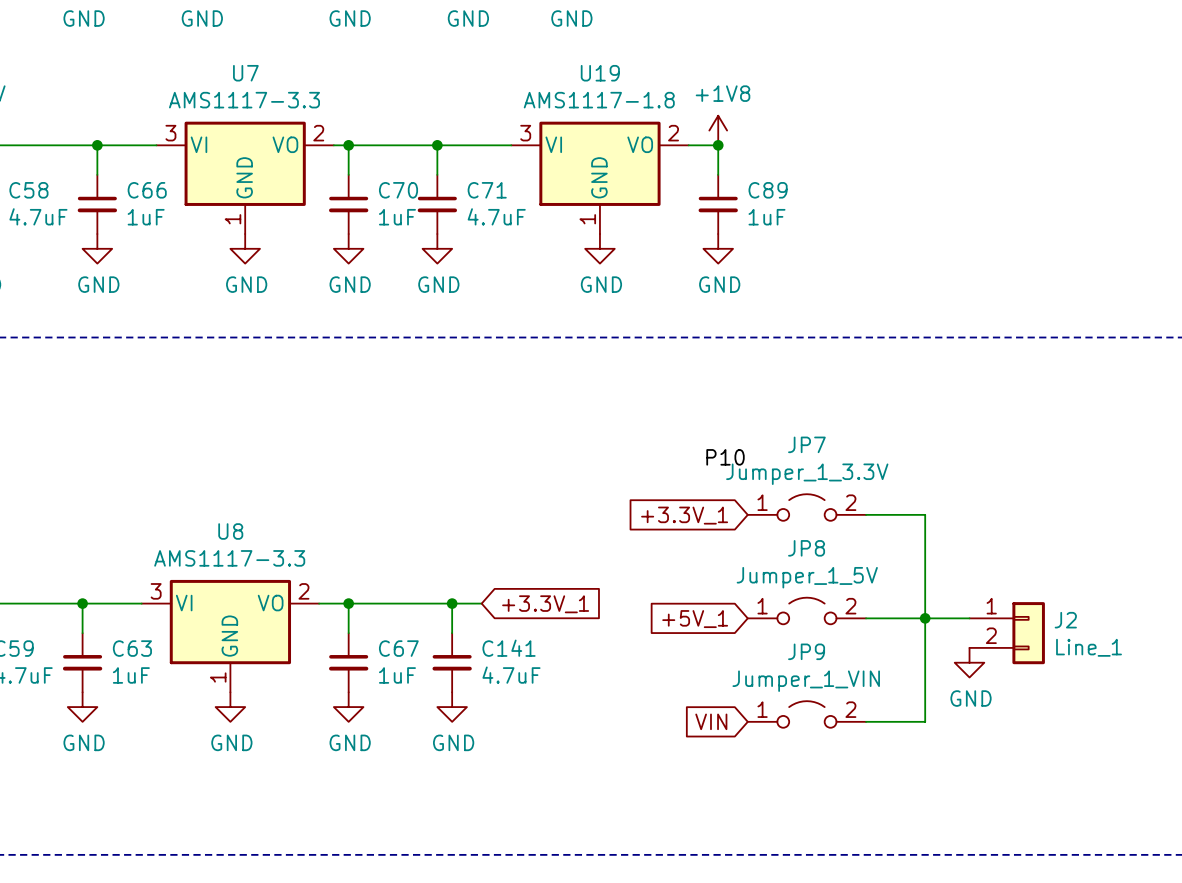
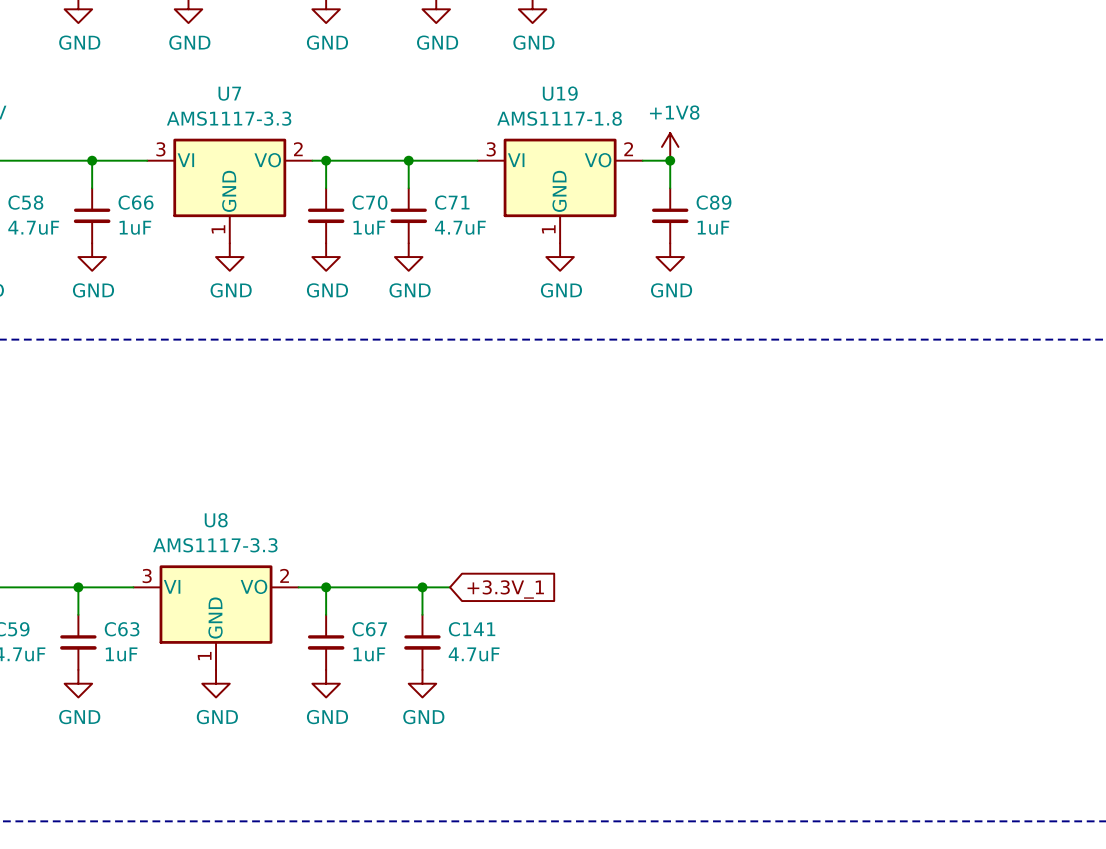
label: P10 (725, 457) -> none
JP7: Jumper_1_3.3V (806, 507) -> none
wire: (866, 514) (925, 514) (925, 721) (866, 721) -> none
global label: +3.3V_1 (684, 515) -> none
JP8: Jumper_1_5V (806, 610) -> none
wire: (866, 618) (969, 618) -> none
junction: (925, 618) -> none
global label: +5V_1 (695, 619) -> none
J2: Line_1 (1007, 633) -> none
power symbol: GND (969, 662) -> none
JP9: Jumper_1_VIN (806, 714) -> none
global label: VIN (711, 721) -> none

